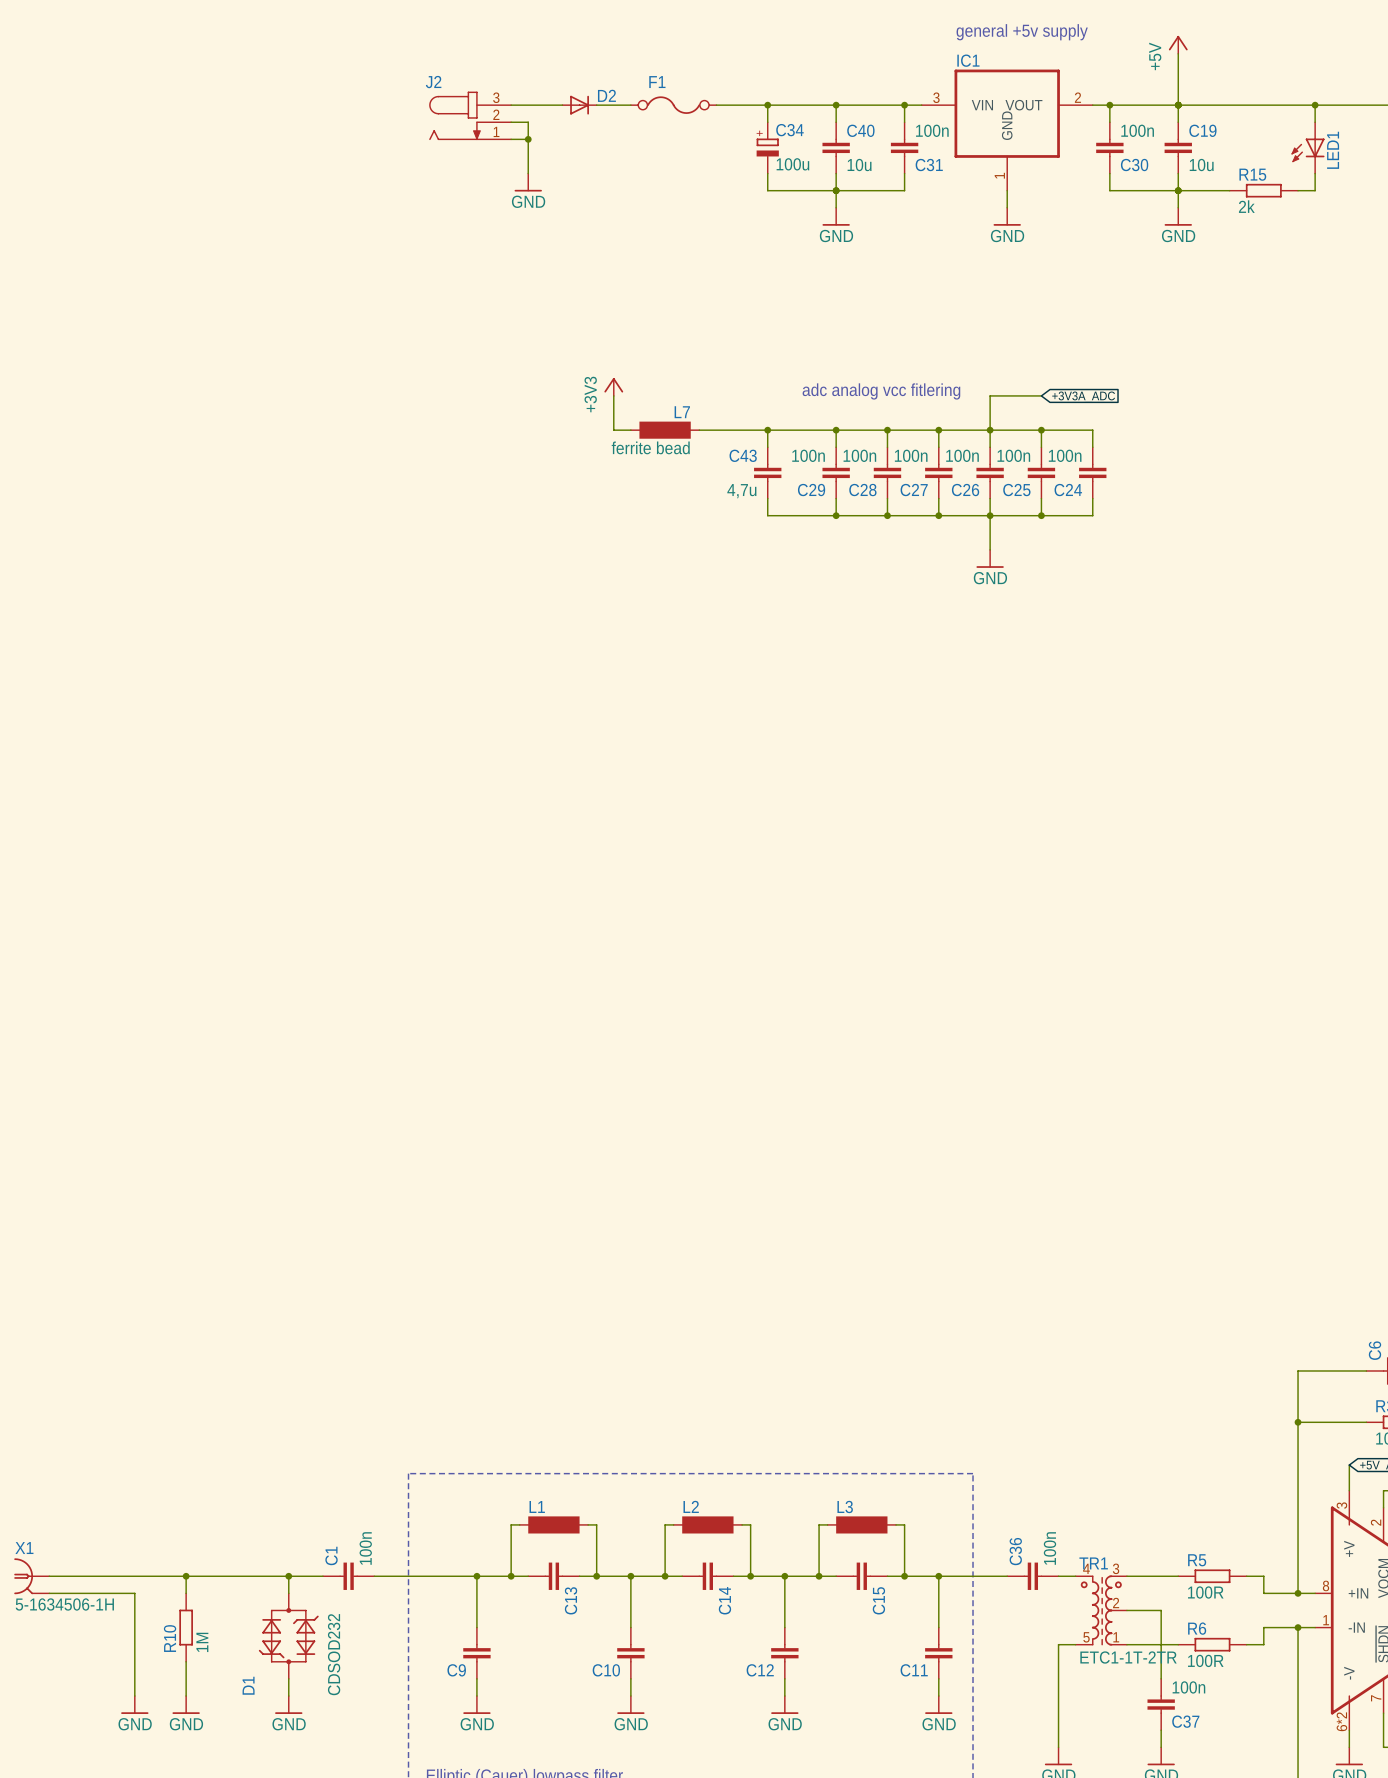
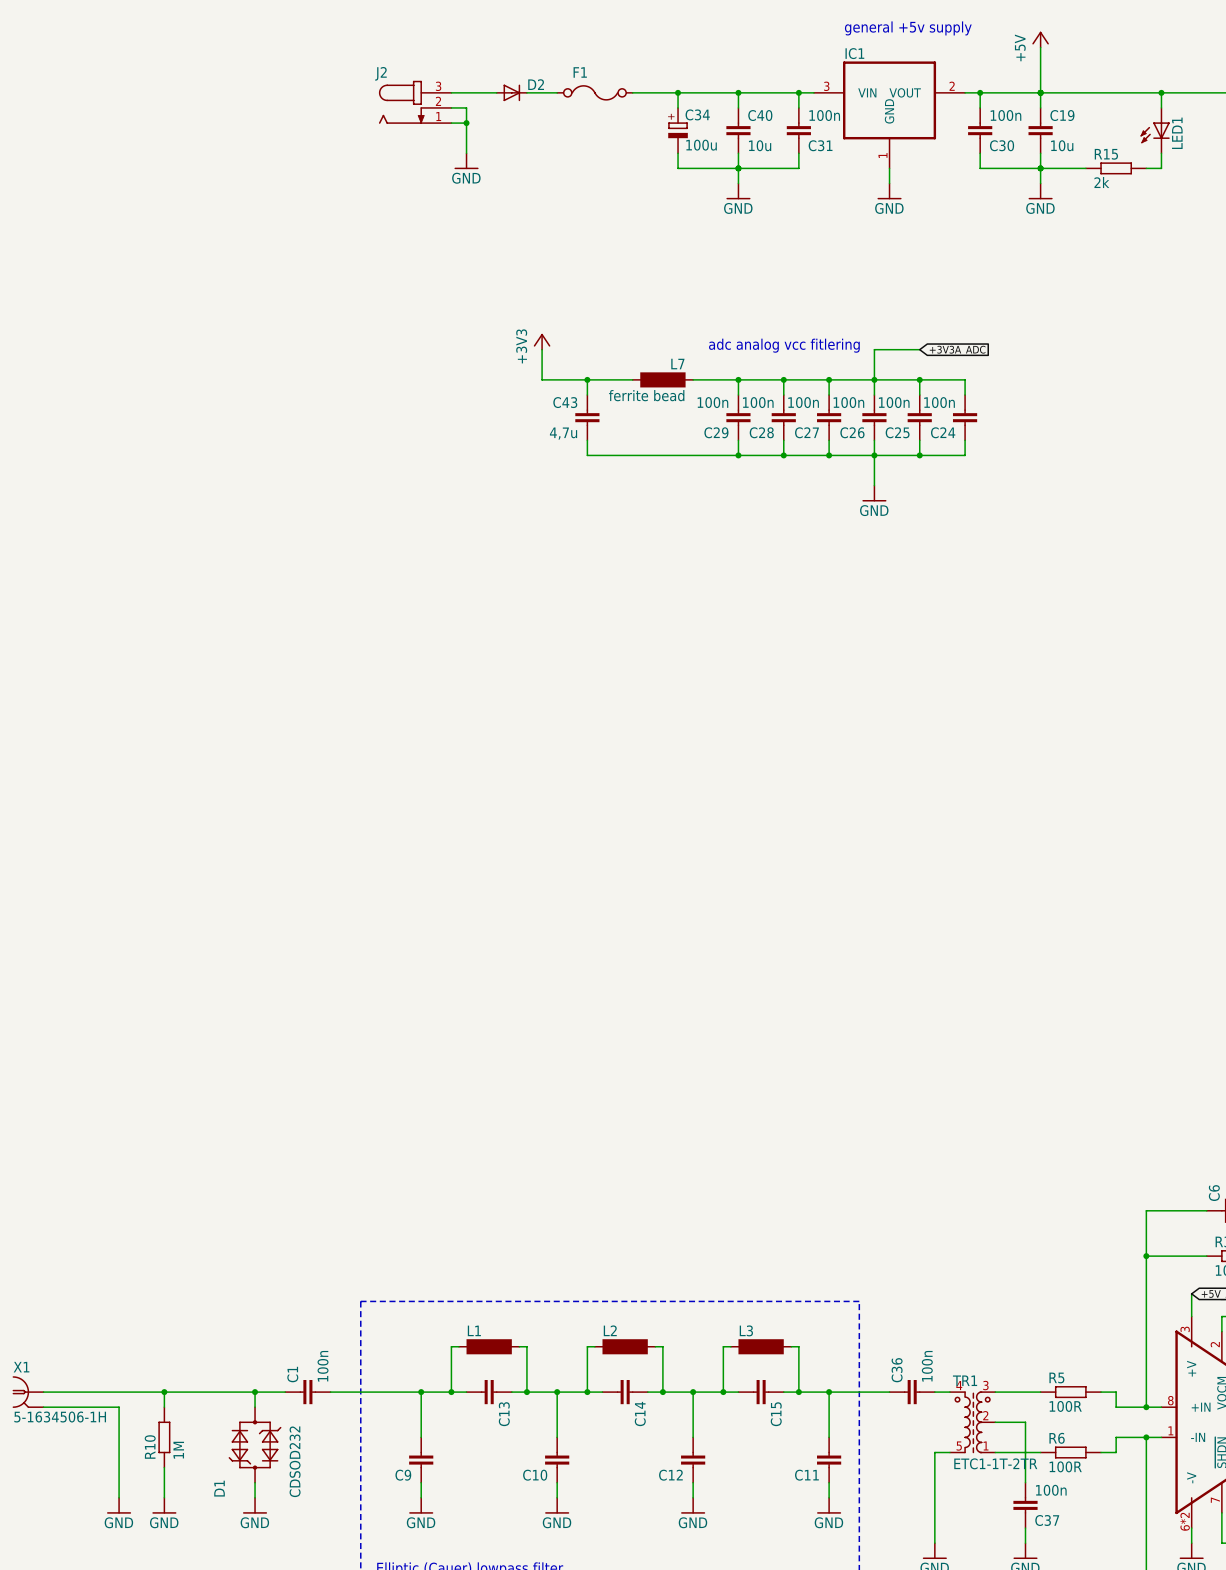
L7 position: (665, 430) -> (662, 379)
junction: none -> (587, 379)
wire: (767, 430) (767, 447) -> (587, 379) (587, 395)
junction: (767, 430) -> none
C43 position: (767, 472) -> (587, 417)
wire: (767, 498) (767, 515) -> (587, 440) (587, 455) (678, 455)

